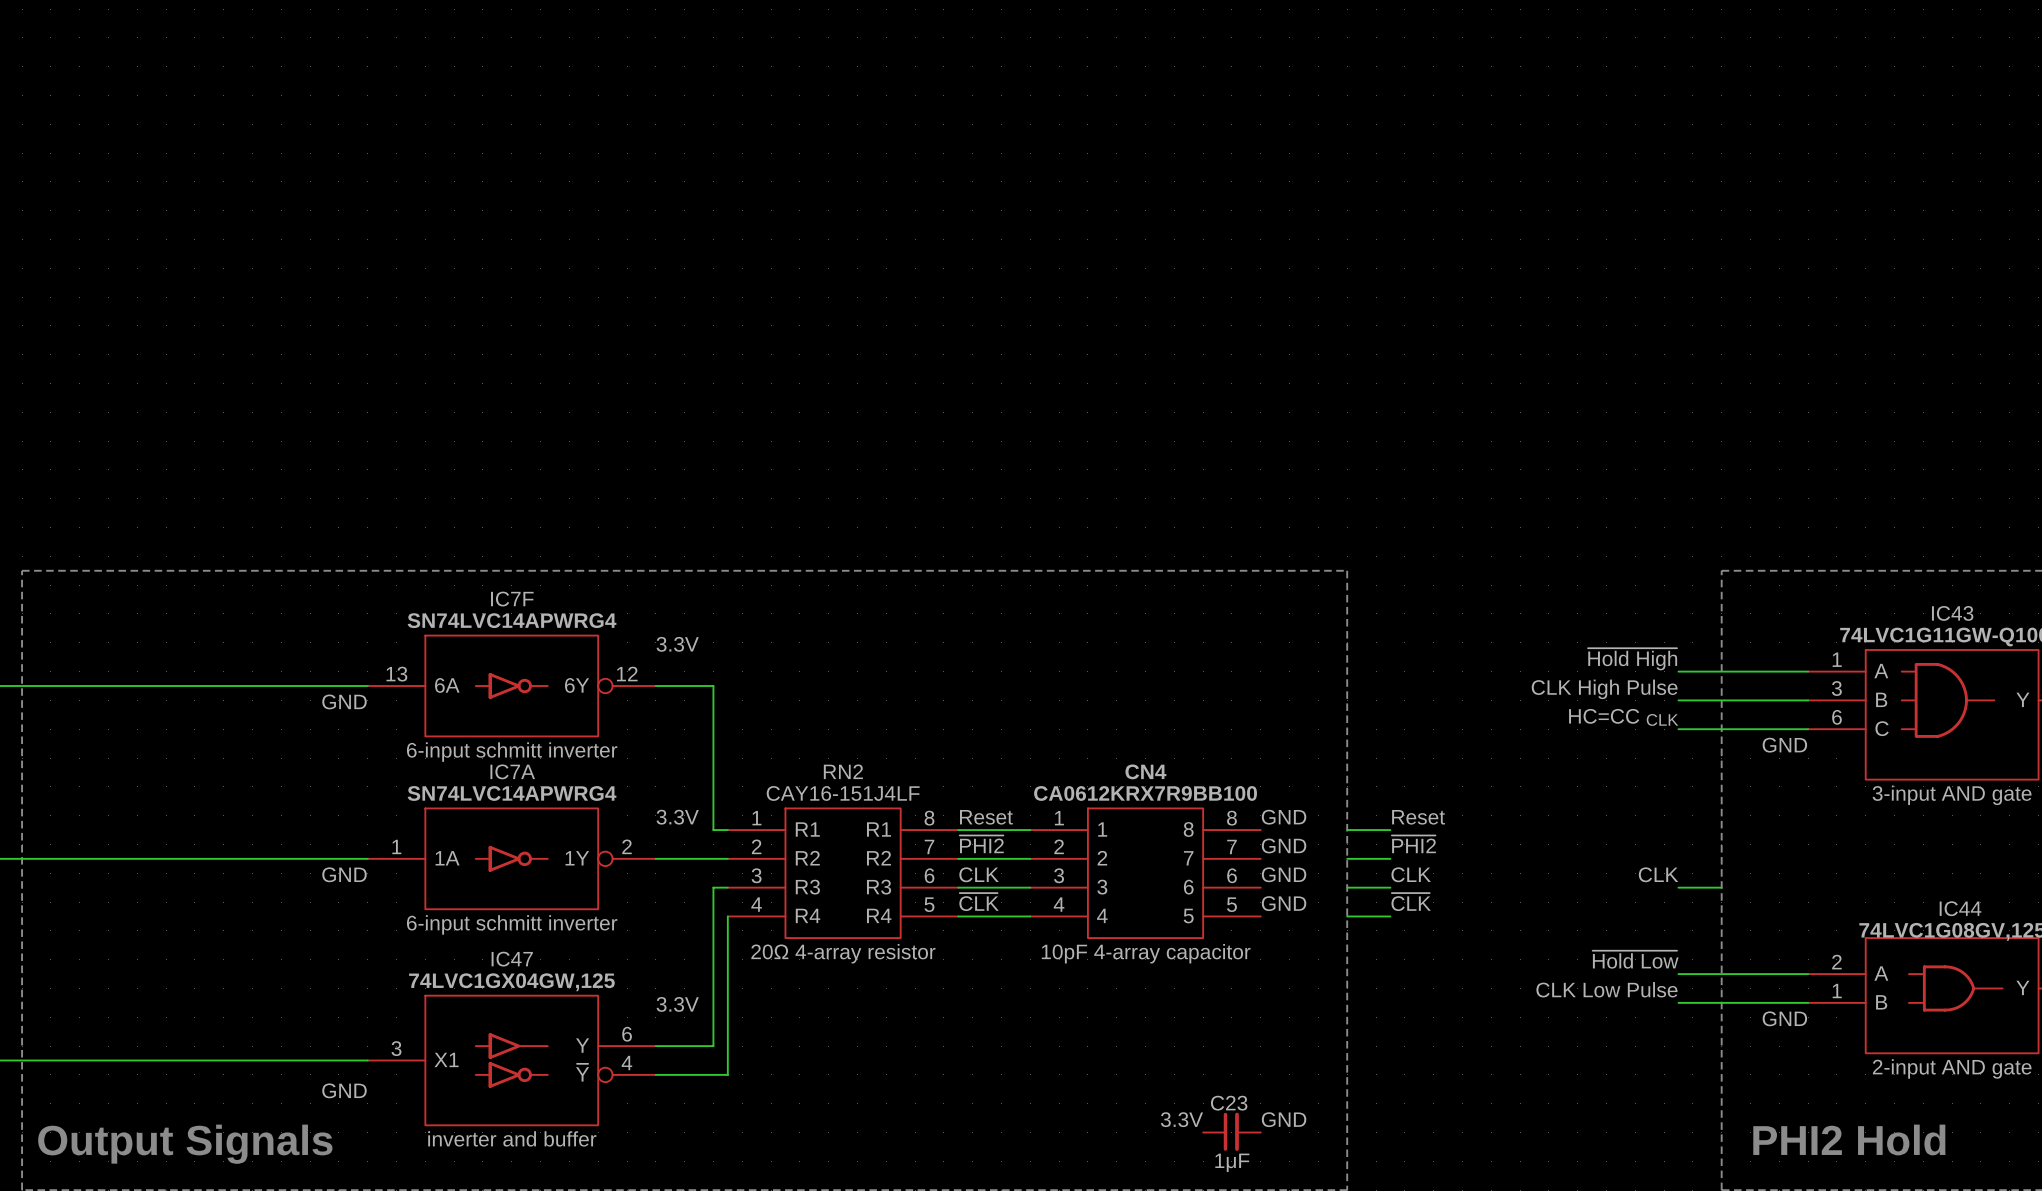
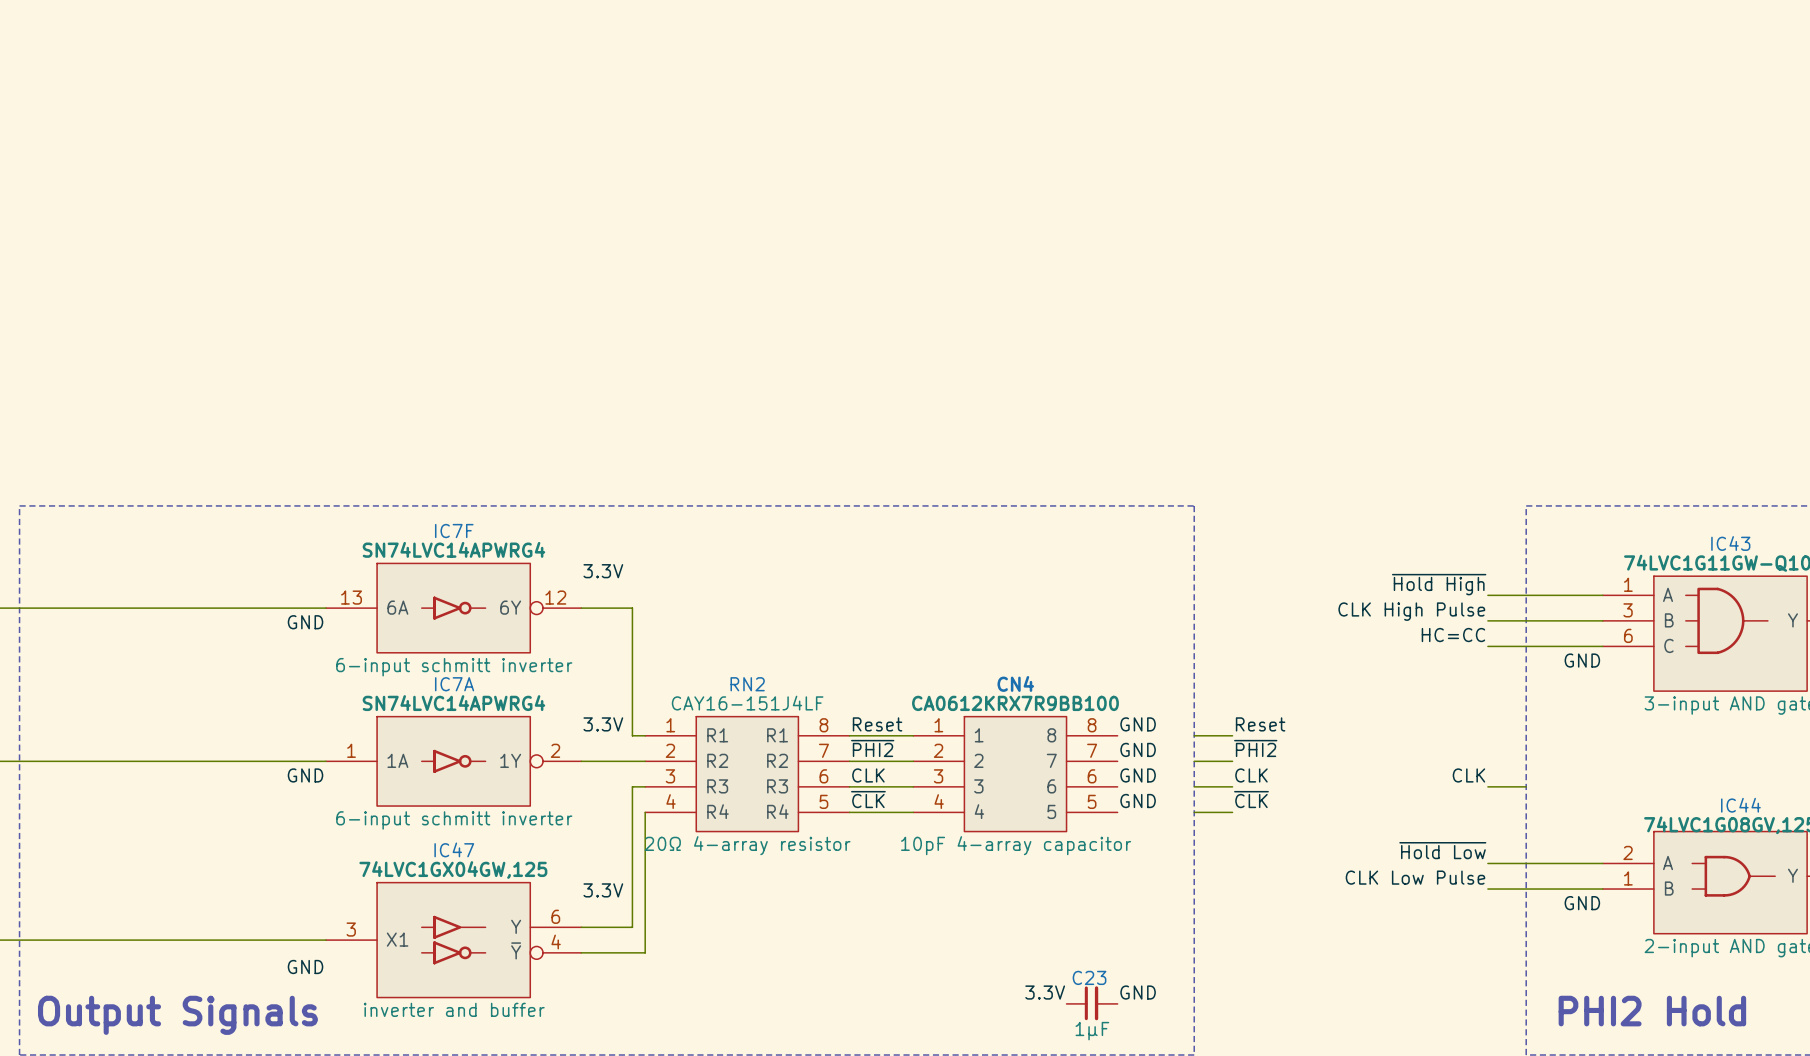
label: HC=CC CLK (1623, 717) -> HC=CC (1453, 635)

